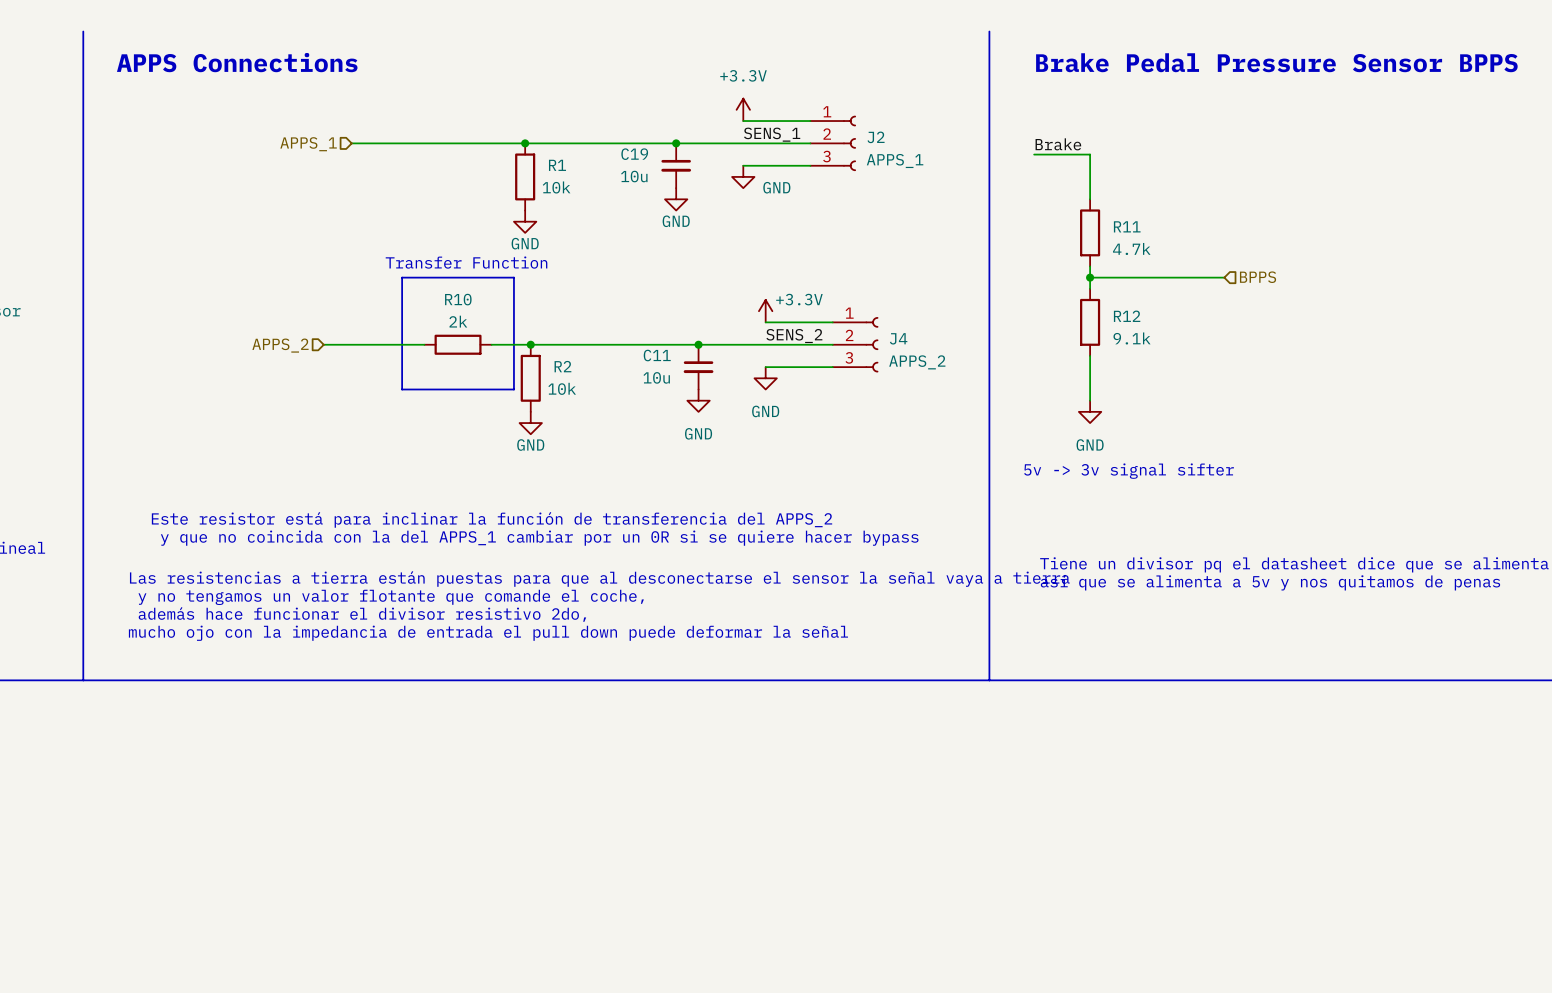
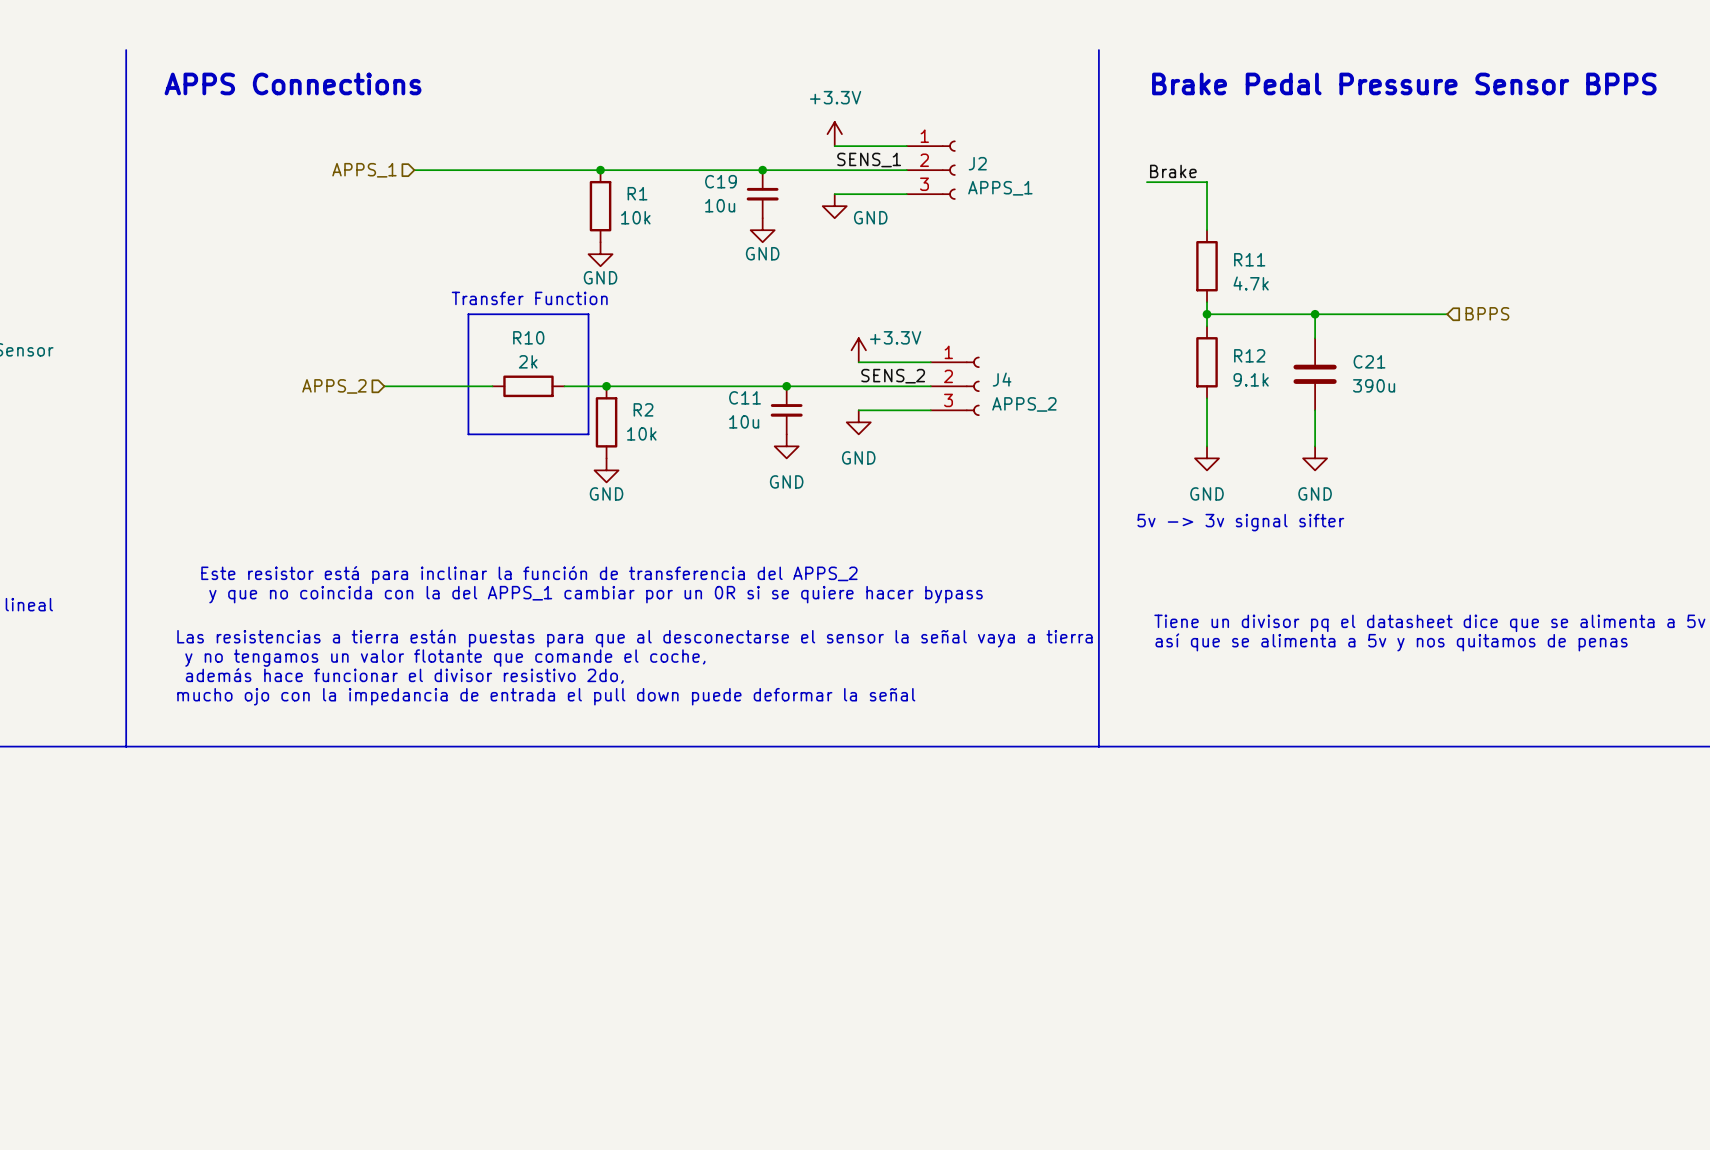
wire: none -> (1315, 314) (1315, 338)
junction: none -> (1315, 314)
wire: none -> (1351, 314) (1447, 314)
hierarchical label position: BPPS (1258, 277) -> BPPS (1487, 313)
C21: none -> 390u (1315, 374)
wire: none -> (1315, 410) (1315, 446)
power symbol: none -> GND (1315, 458)

